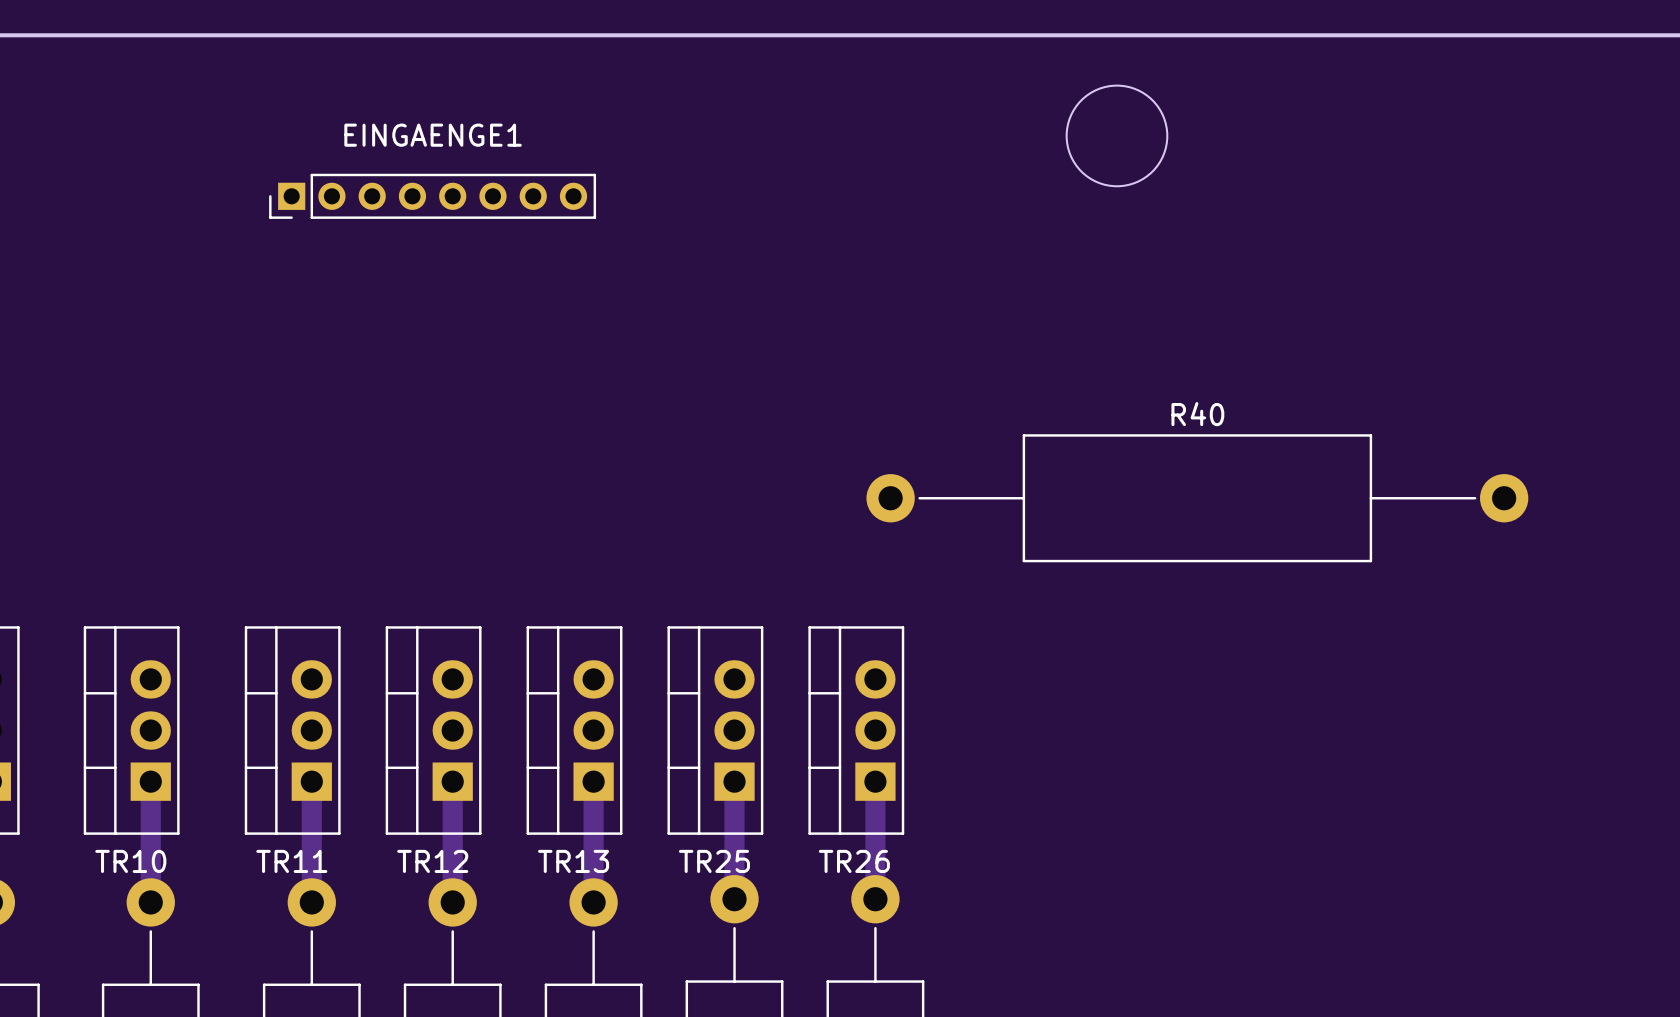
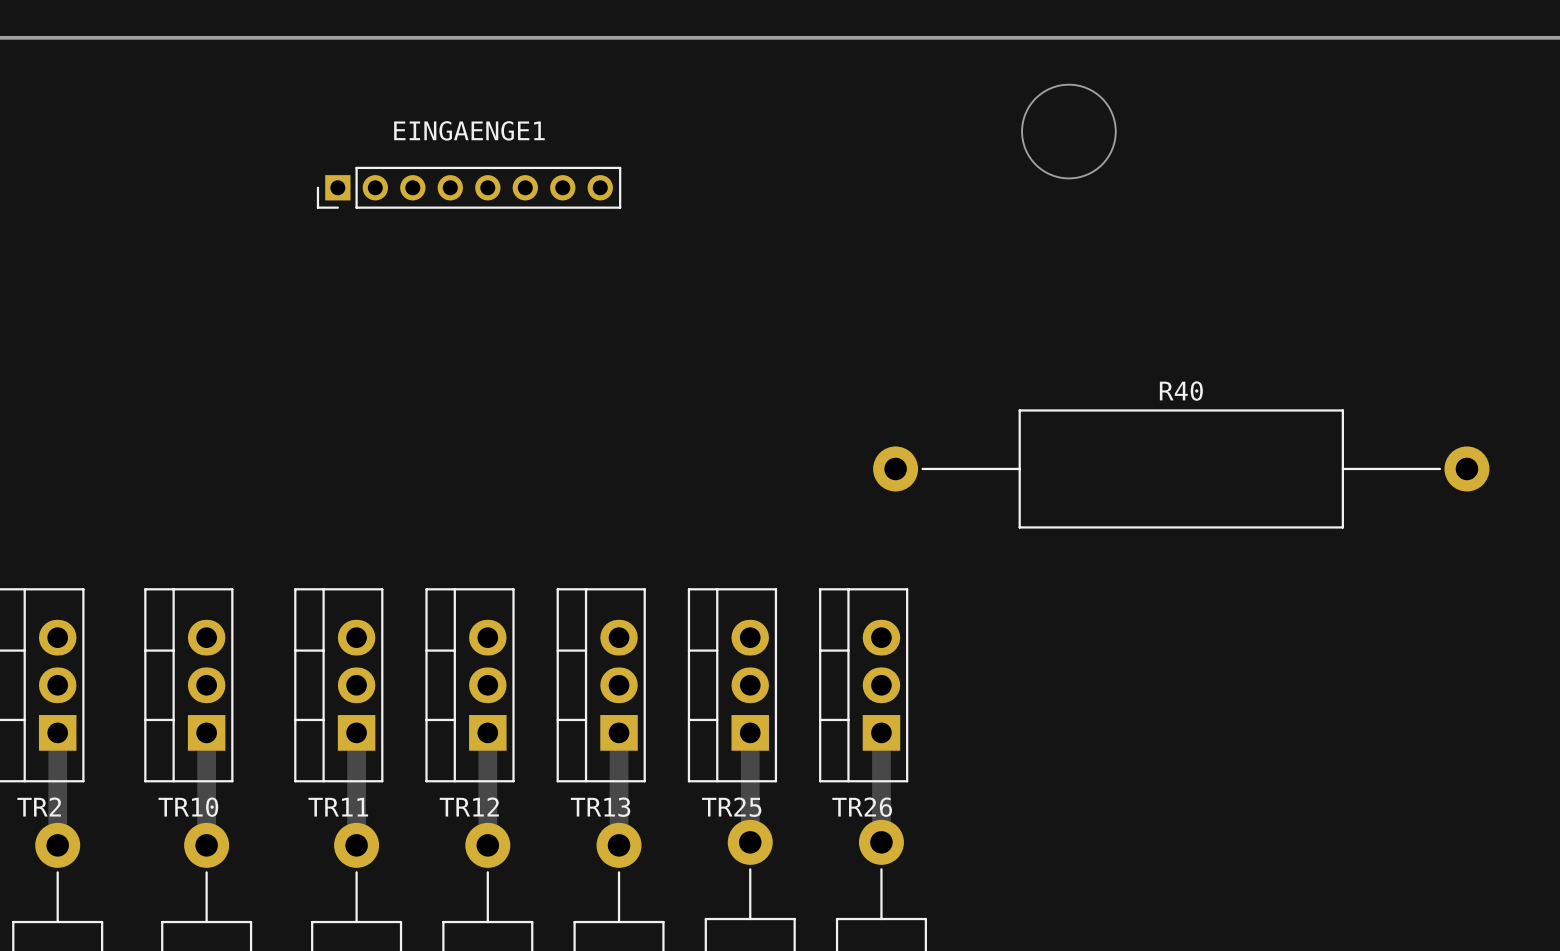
round board edge position: (1116, 135) -> (1068, 131)

